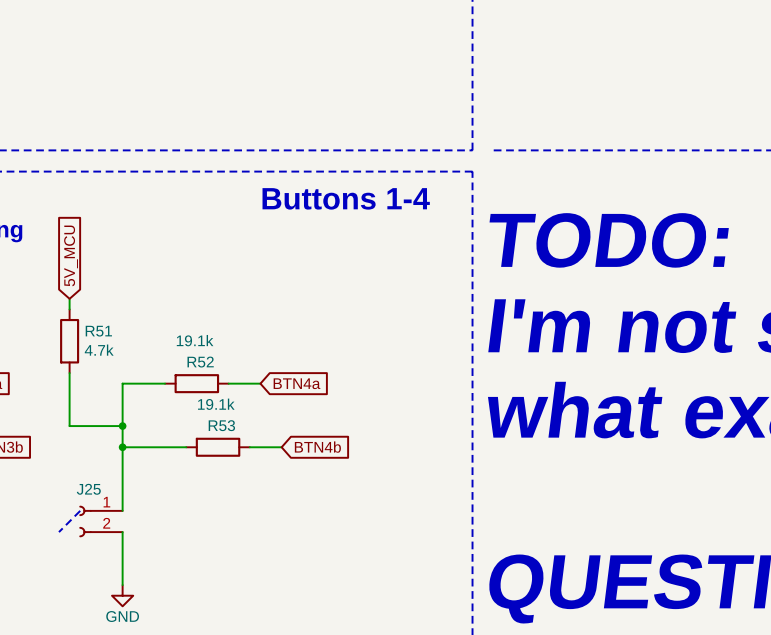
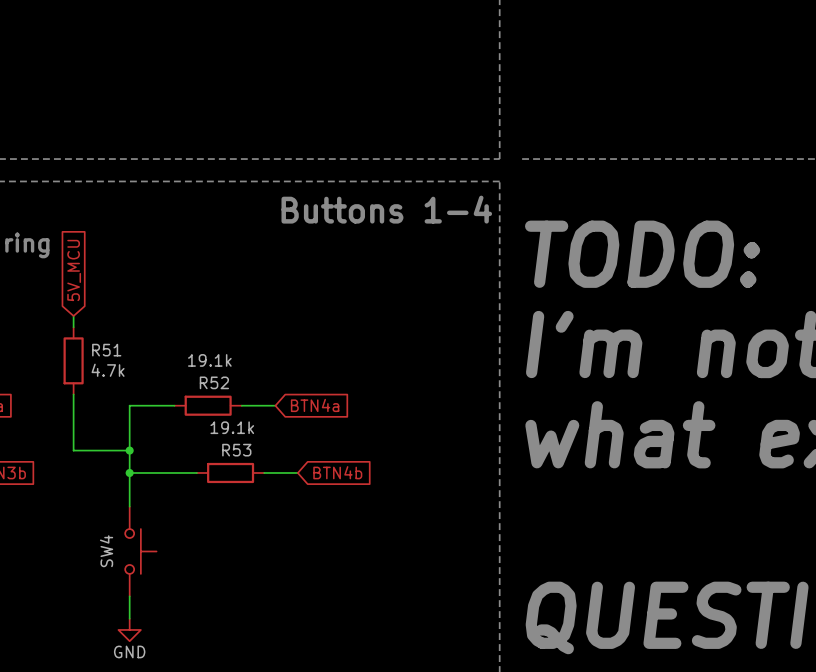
line: (80, 510) (59, 532) -> none
J25: (101, 521) -> none
SW4: none -> (140, 551)

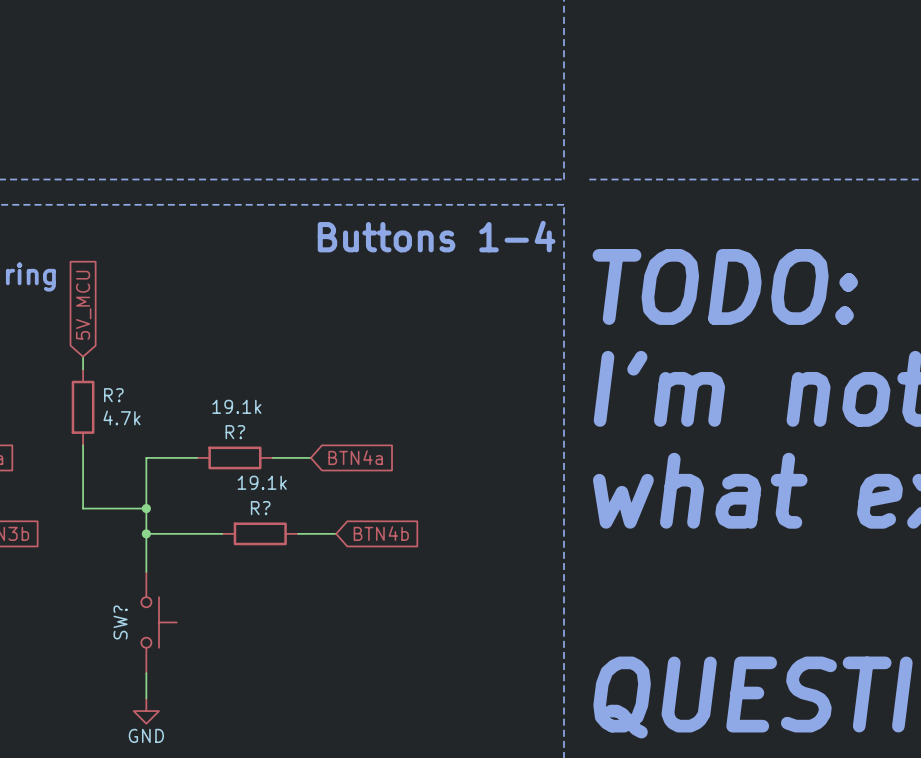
R51 name: R51 (106, 350) -> R? (113, 395)
R52 name: R52 (214, 382) -> R? (235, 432)
R53 name: R53 (236, 450) -> R? (260, 508)
SW4 name: SW4 (106, 551) -> SW? (120, 622)

